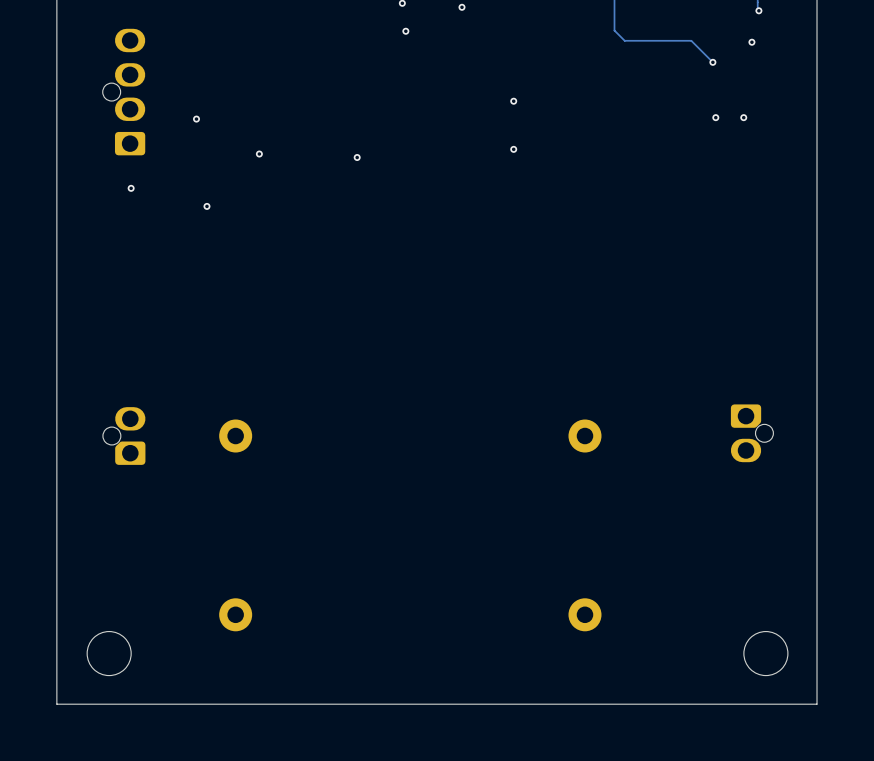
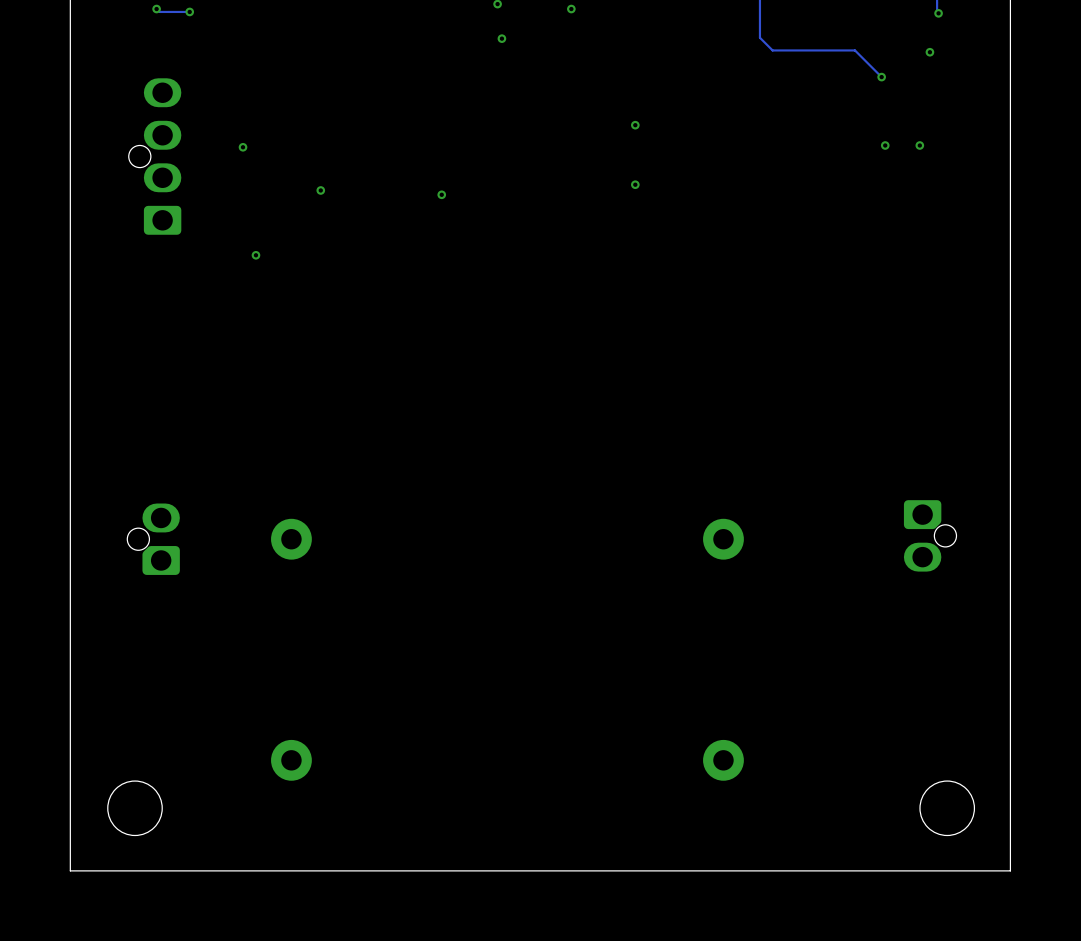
track: none -> (156, 9) (159, 11) (188, 11)
via: none -> (156, 9)
via: none -> (189, 11)
part position: (123, 92) -> (155, 156)
via: (131, 188) -> none

